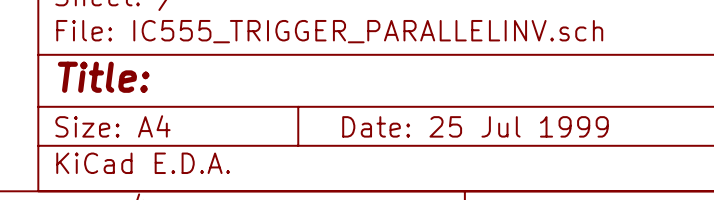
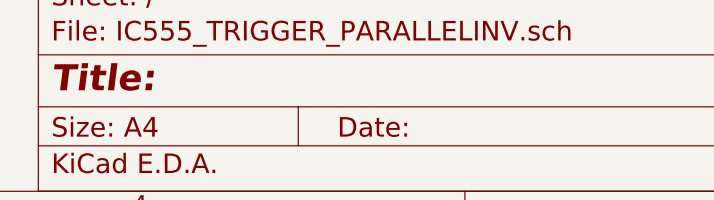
title block: Date: 25 Jul 1999 (475, 126) -> Date: (373, 127)

